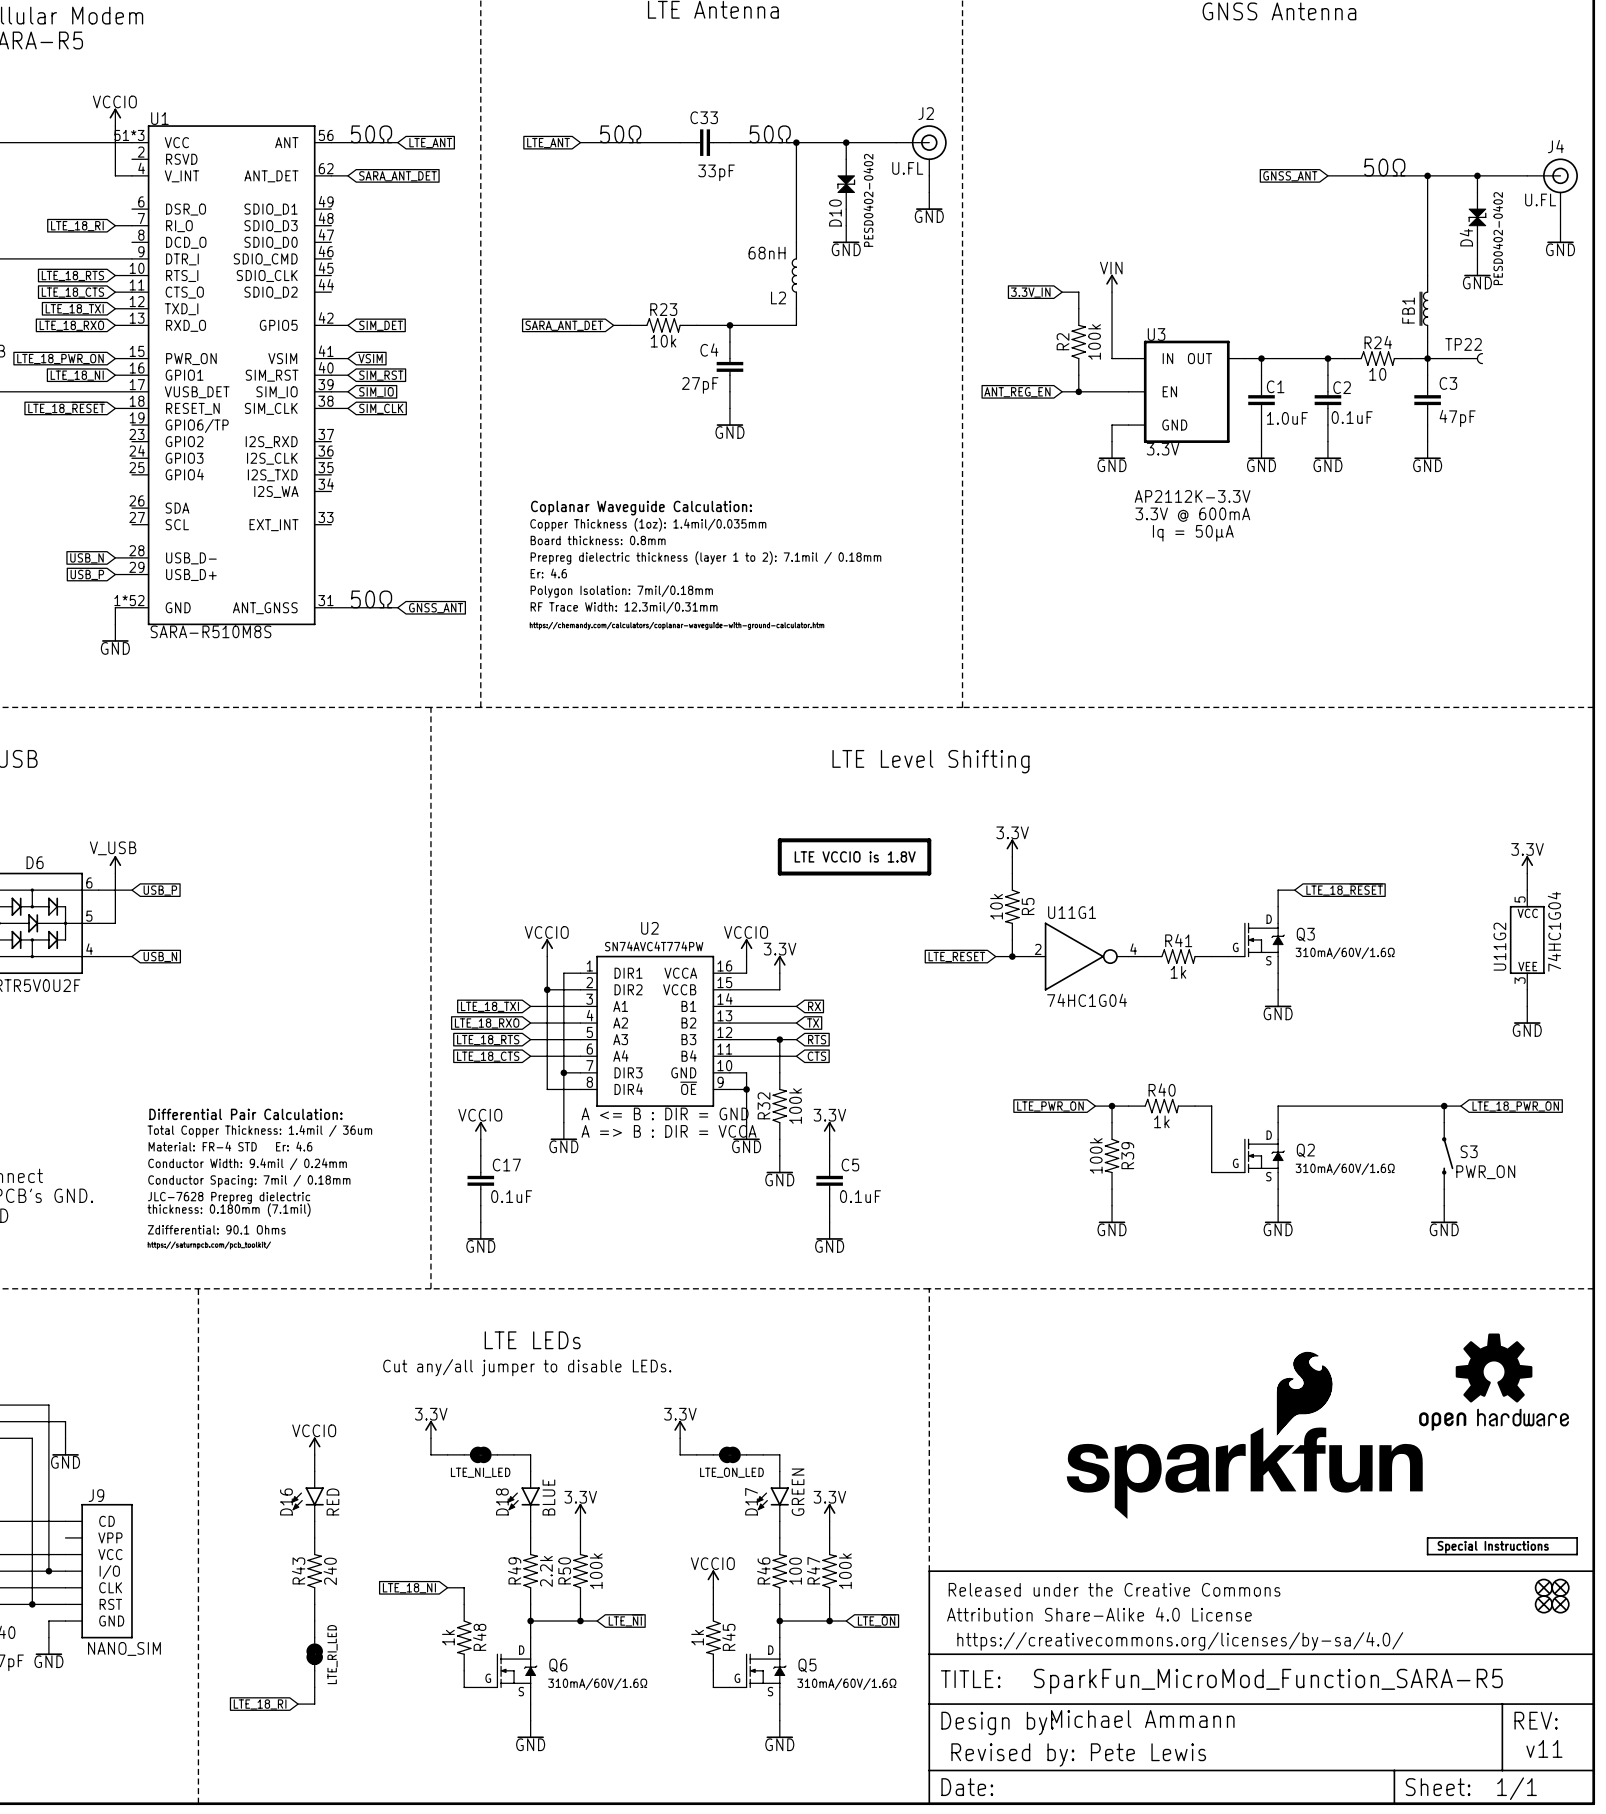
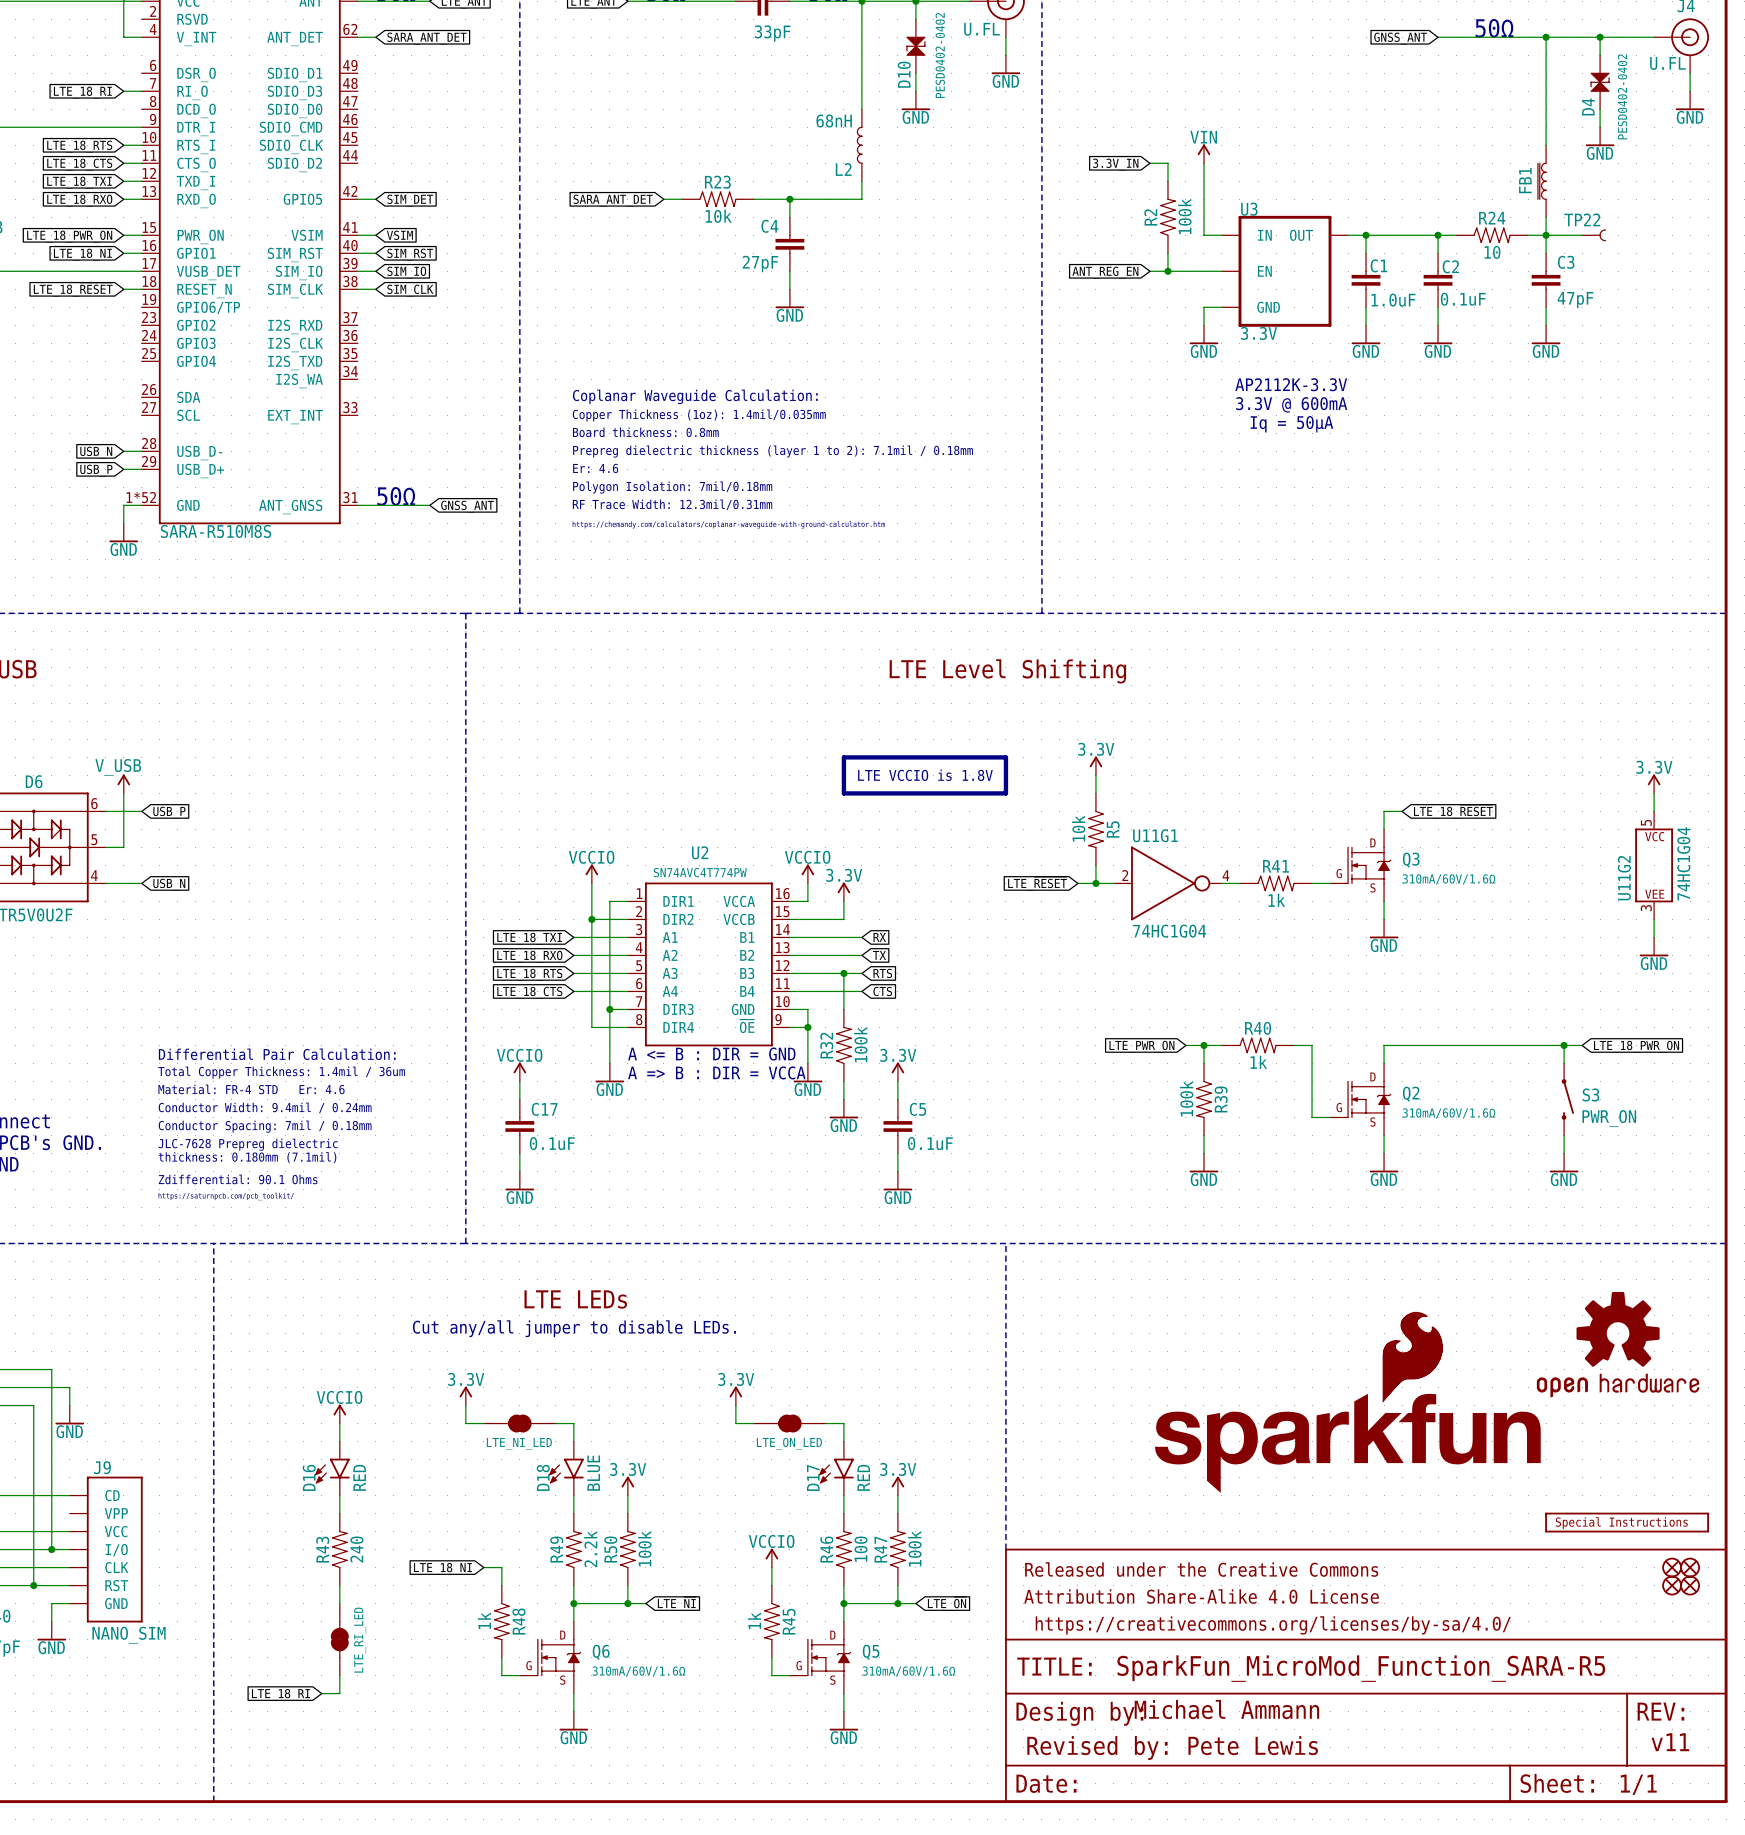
D17 value: GREEN (798, 1492) -> RED (863, 1477)

